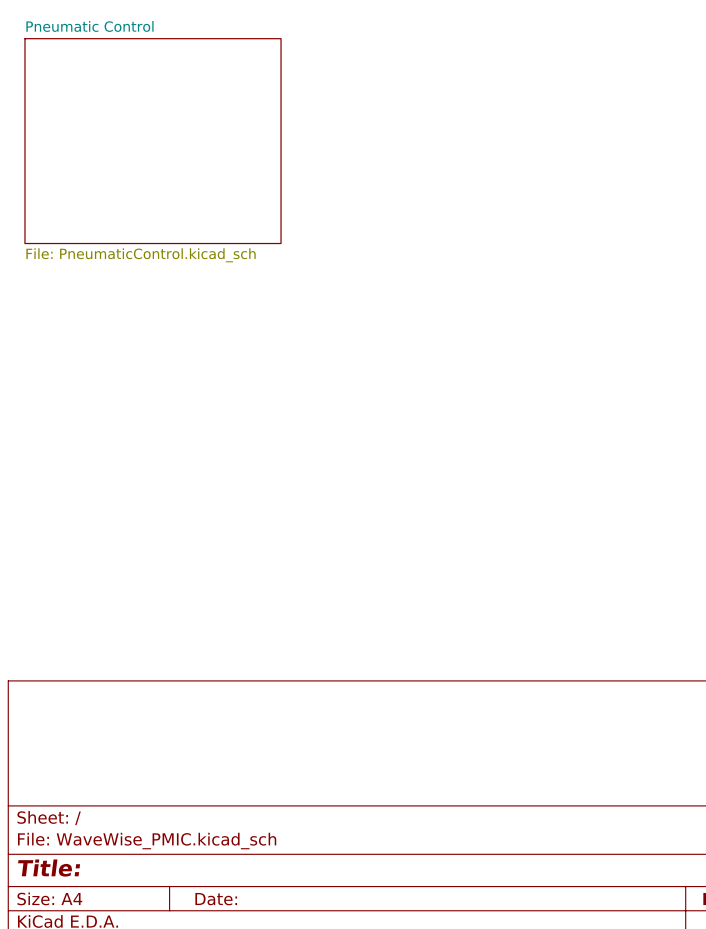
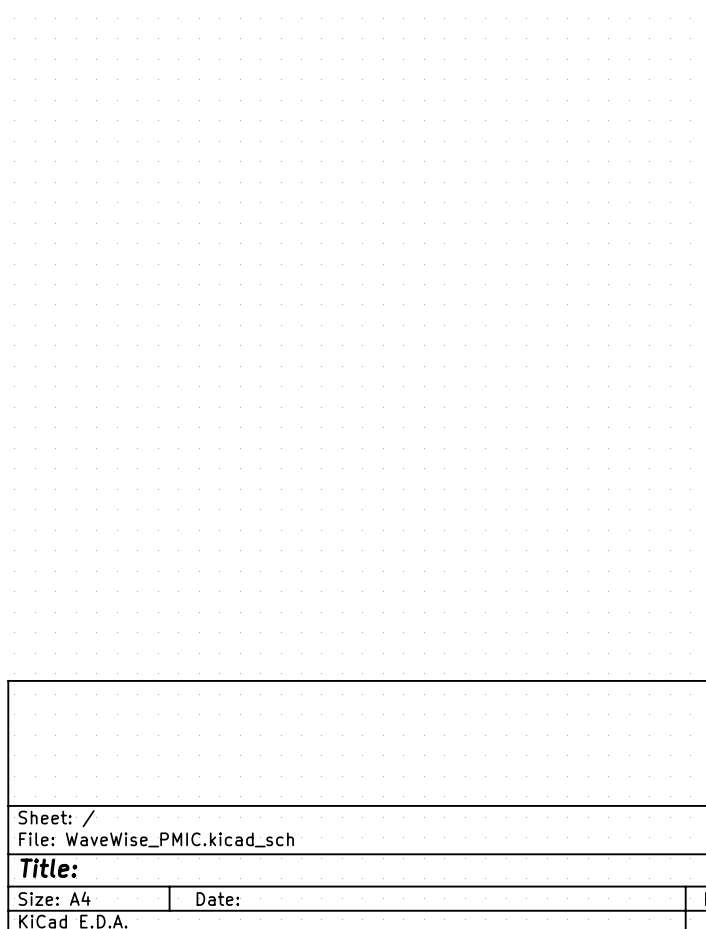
sheet Pneumatic Control: File: PneumaticControl.kicad_sch (153, 141) -> none

